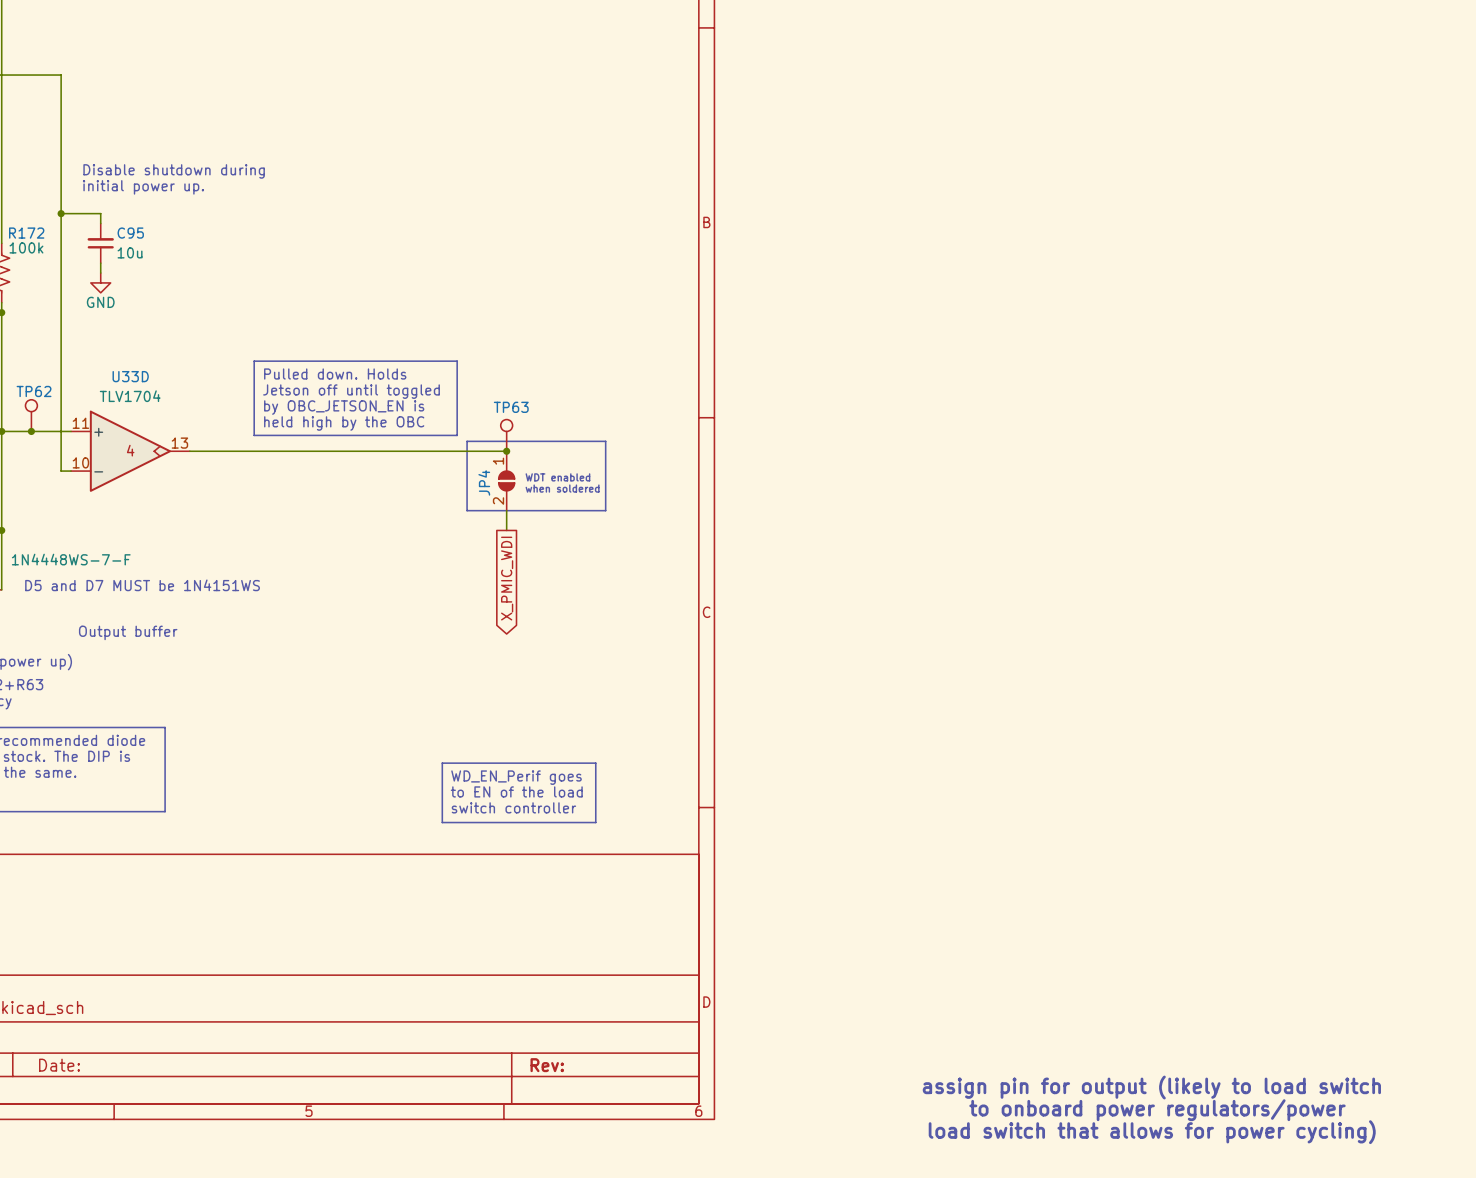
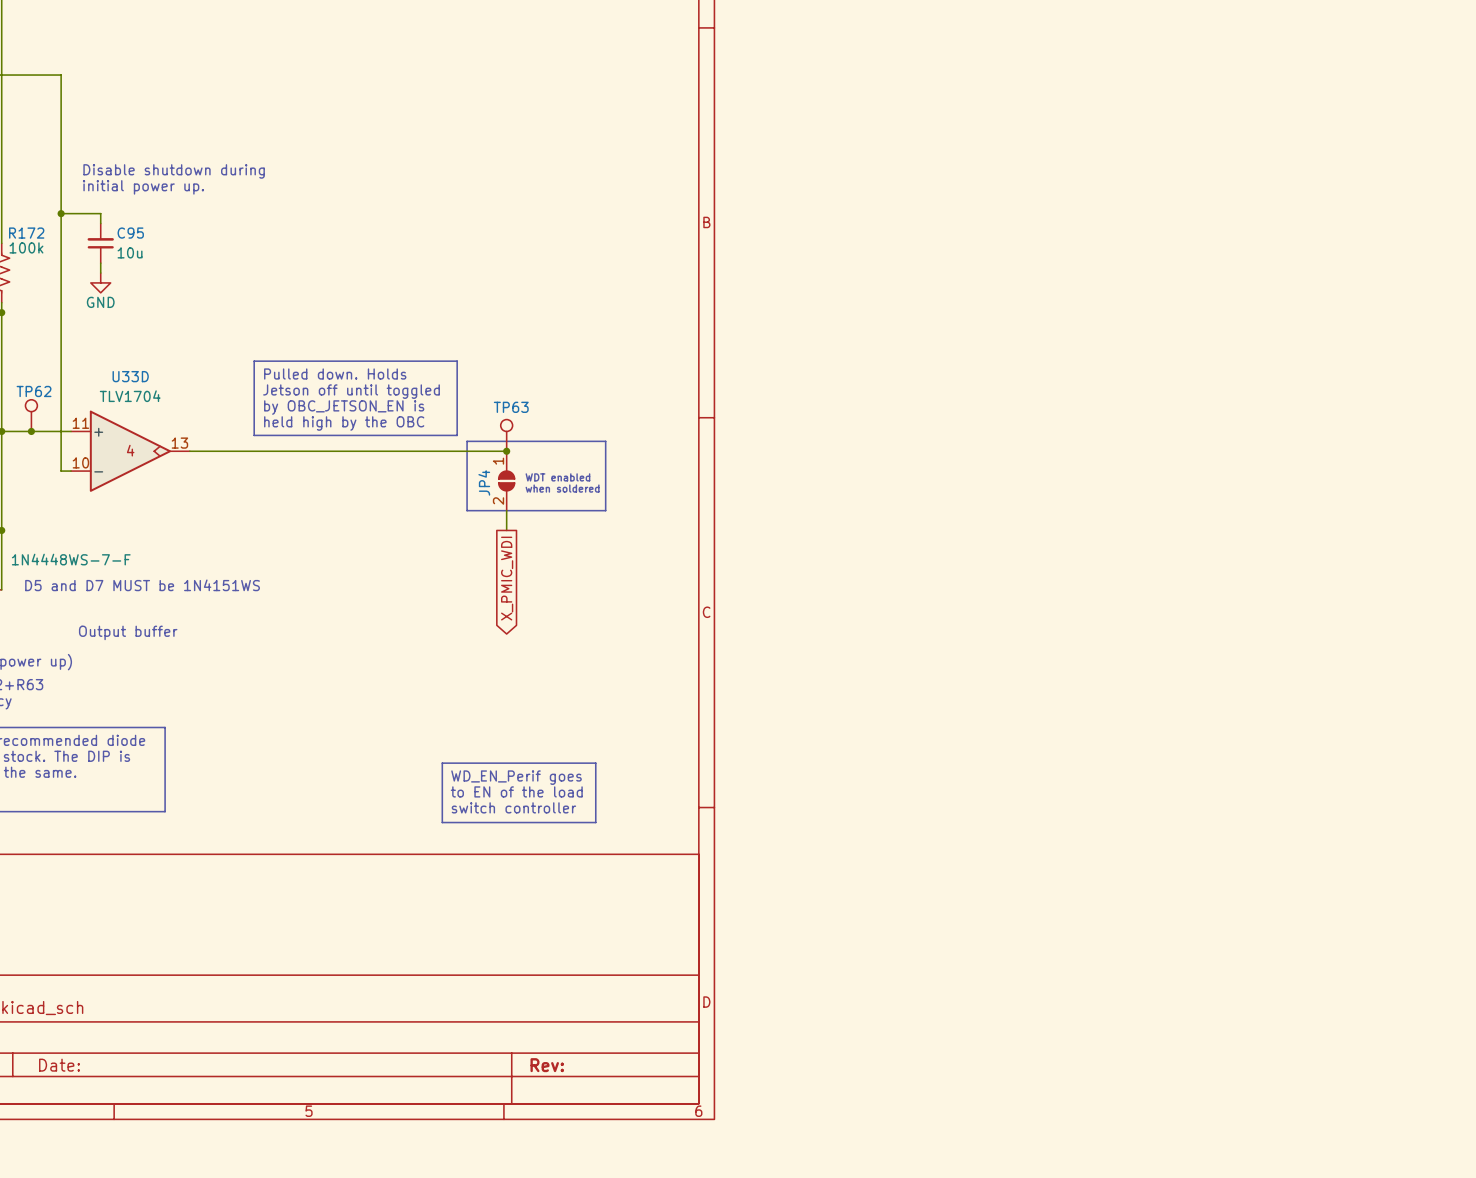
text: assign pin for output (likely to load switch (1151, 1087) -> none
text: to onboard power regulators/power (1157, 1110) -> none
text: load switch that allows for power cycling) (1152, 1132) -> none

